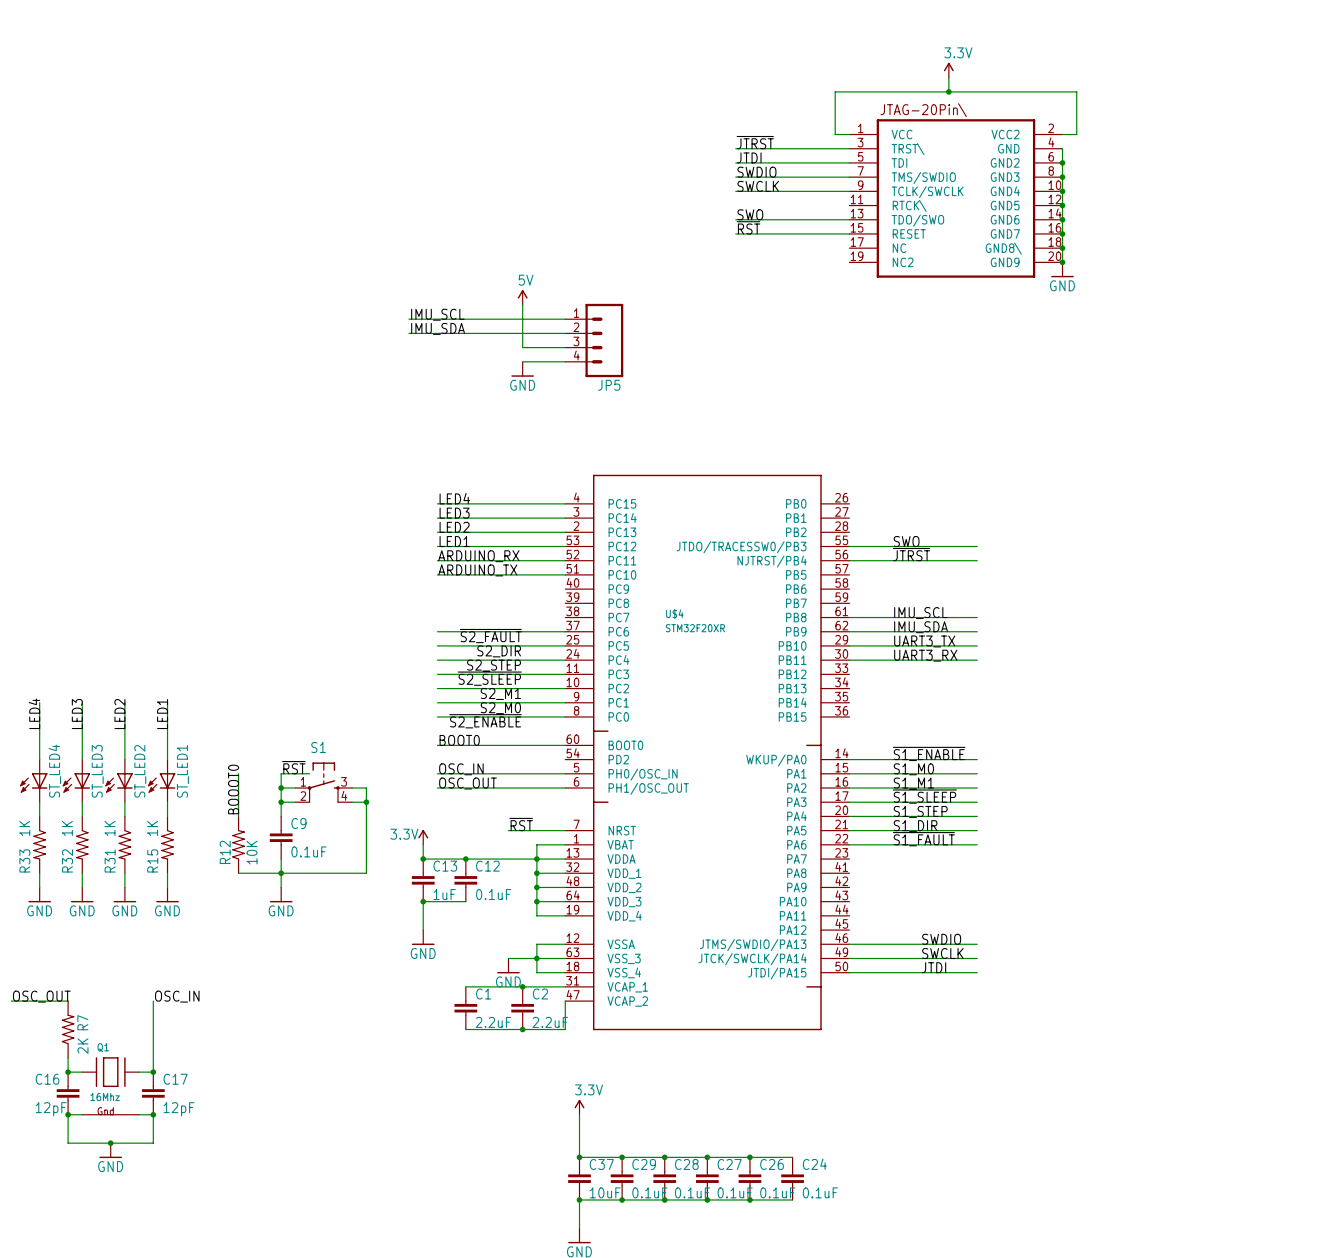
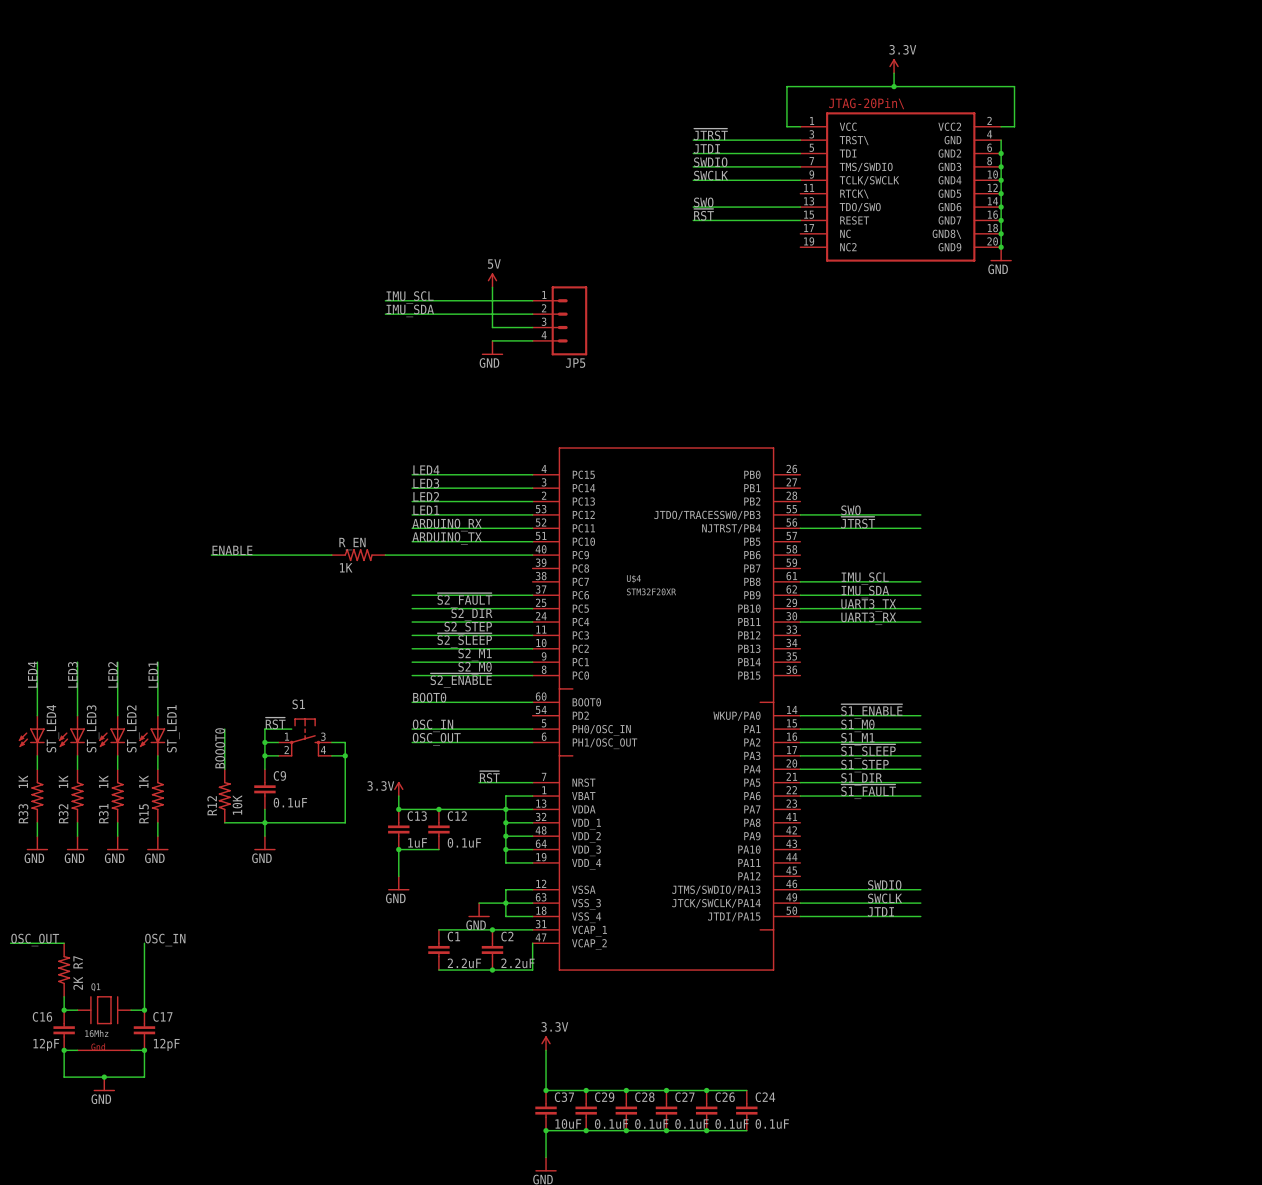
label: none -> ENABLE (232, 550)
wire: none -> (211, 555) (331, 555)
R_EN: none -> 1K (358, 555)
wire: none -> (385, 555) (532, 555)

